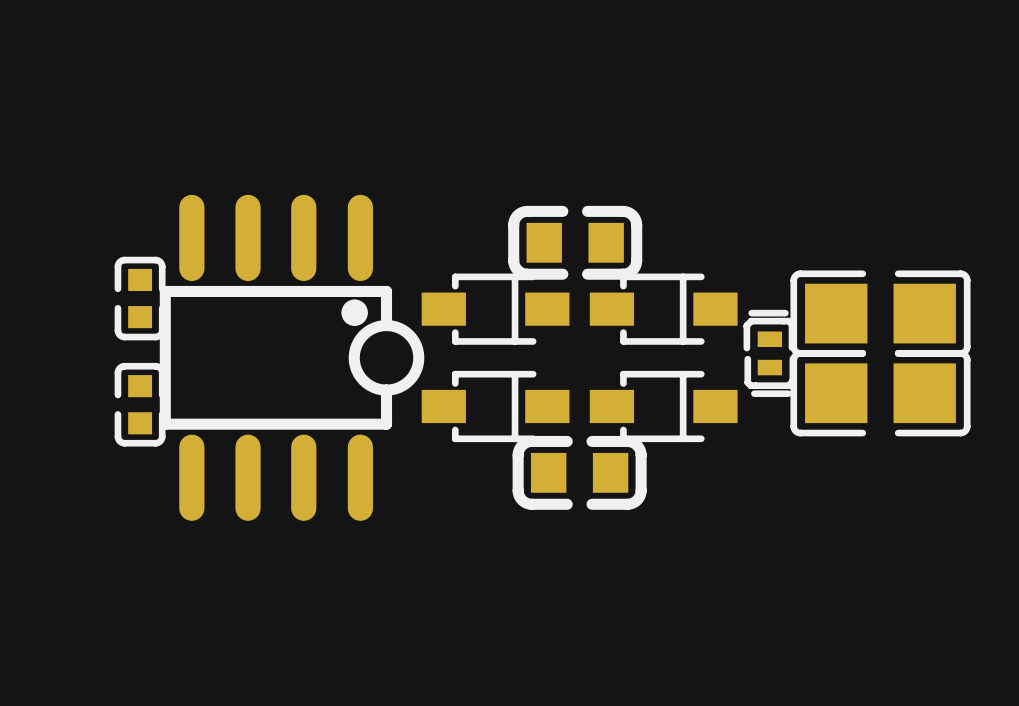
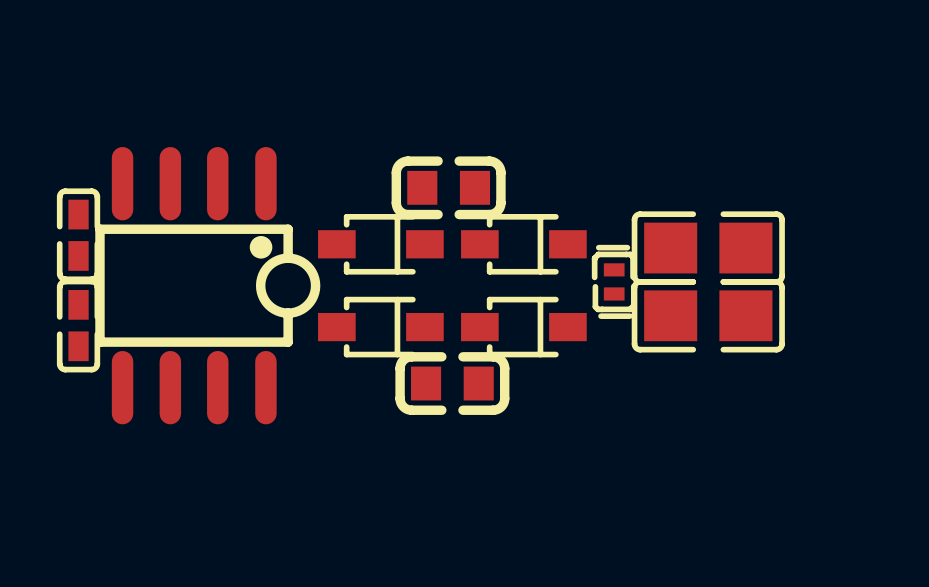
part footprint: [114, 256, 166, 341] -> [56, 188, 101, 283]
part footprint: [114, 362, 166, 447] -> [56, 278, 101, 373]

